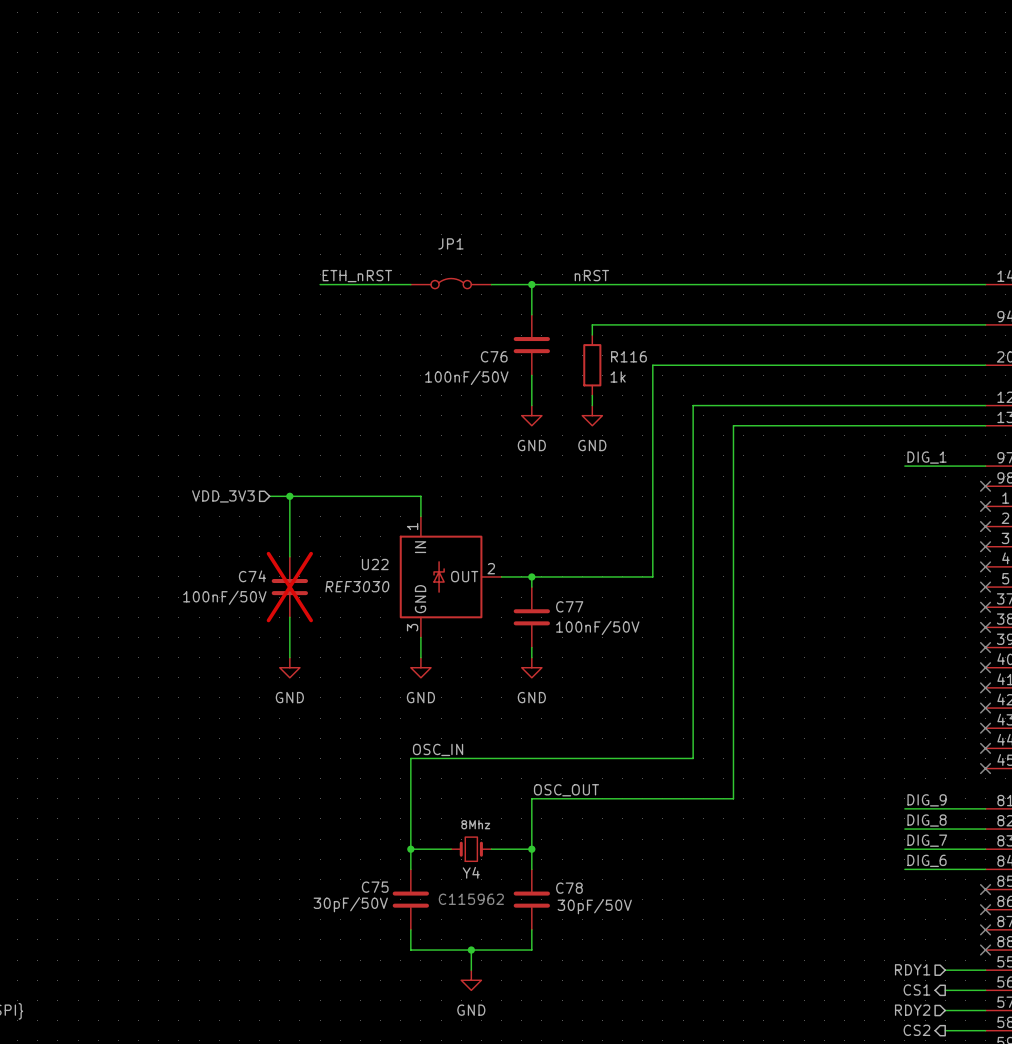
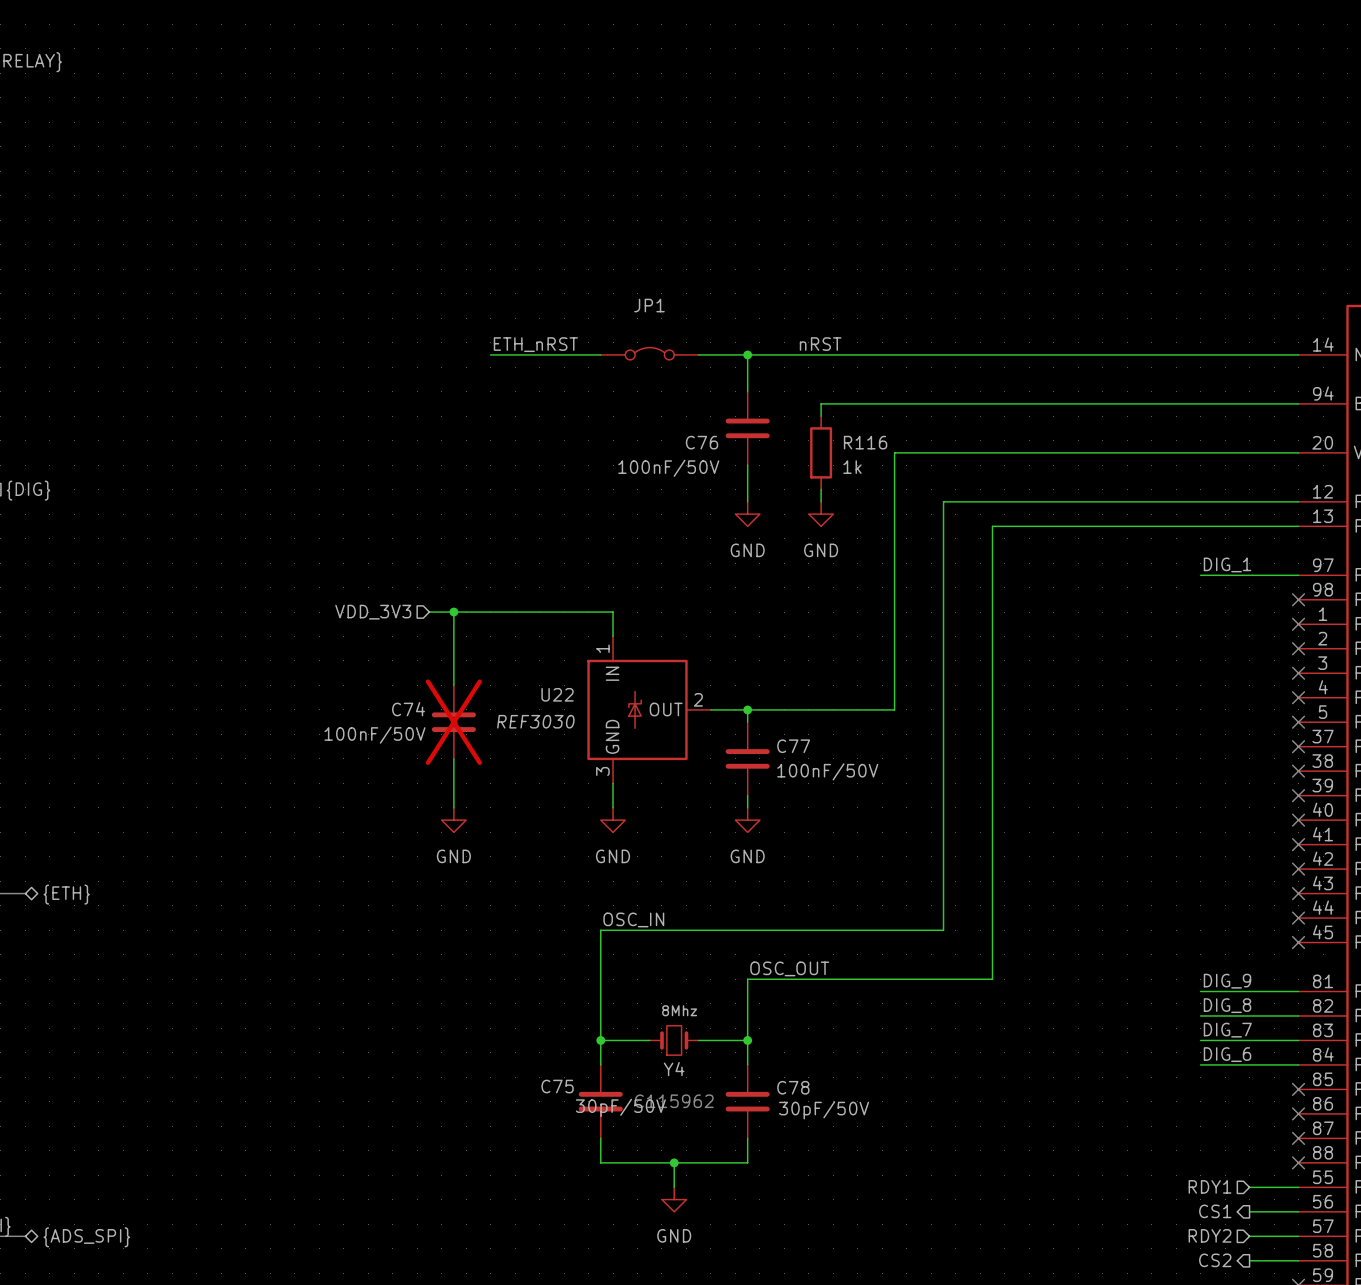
C75 value position: 30pF/50V (350, 904) -> 30pF/50V (620, 1107)

